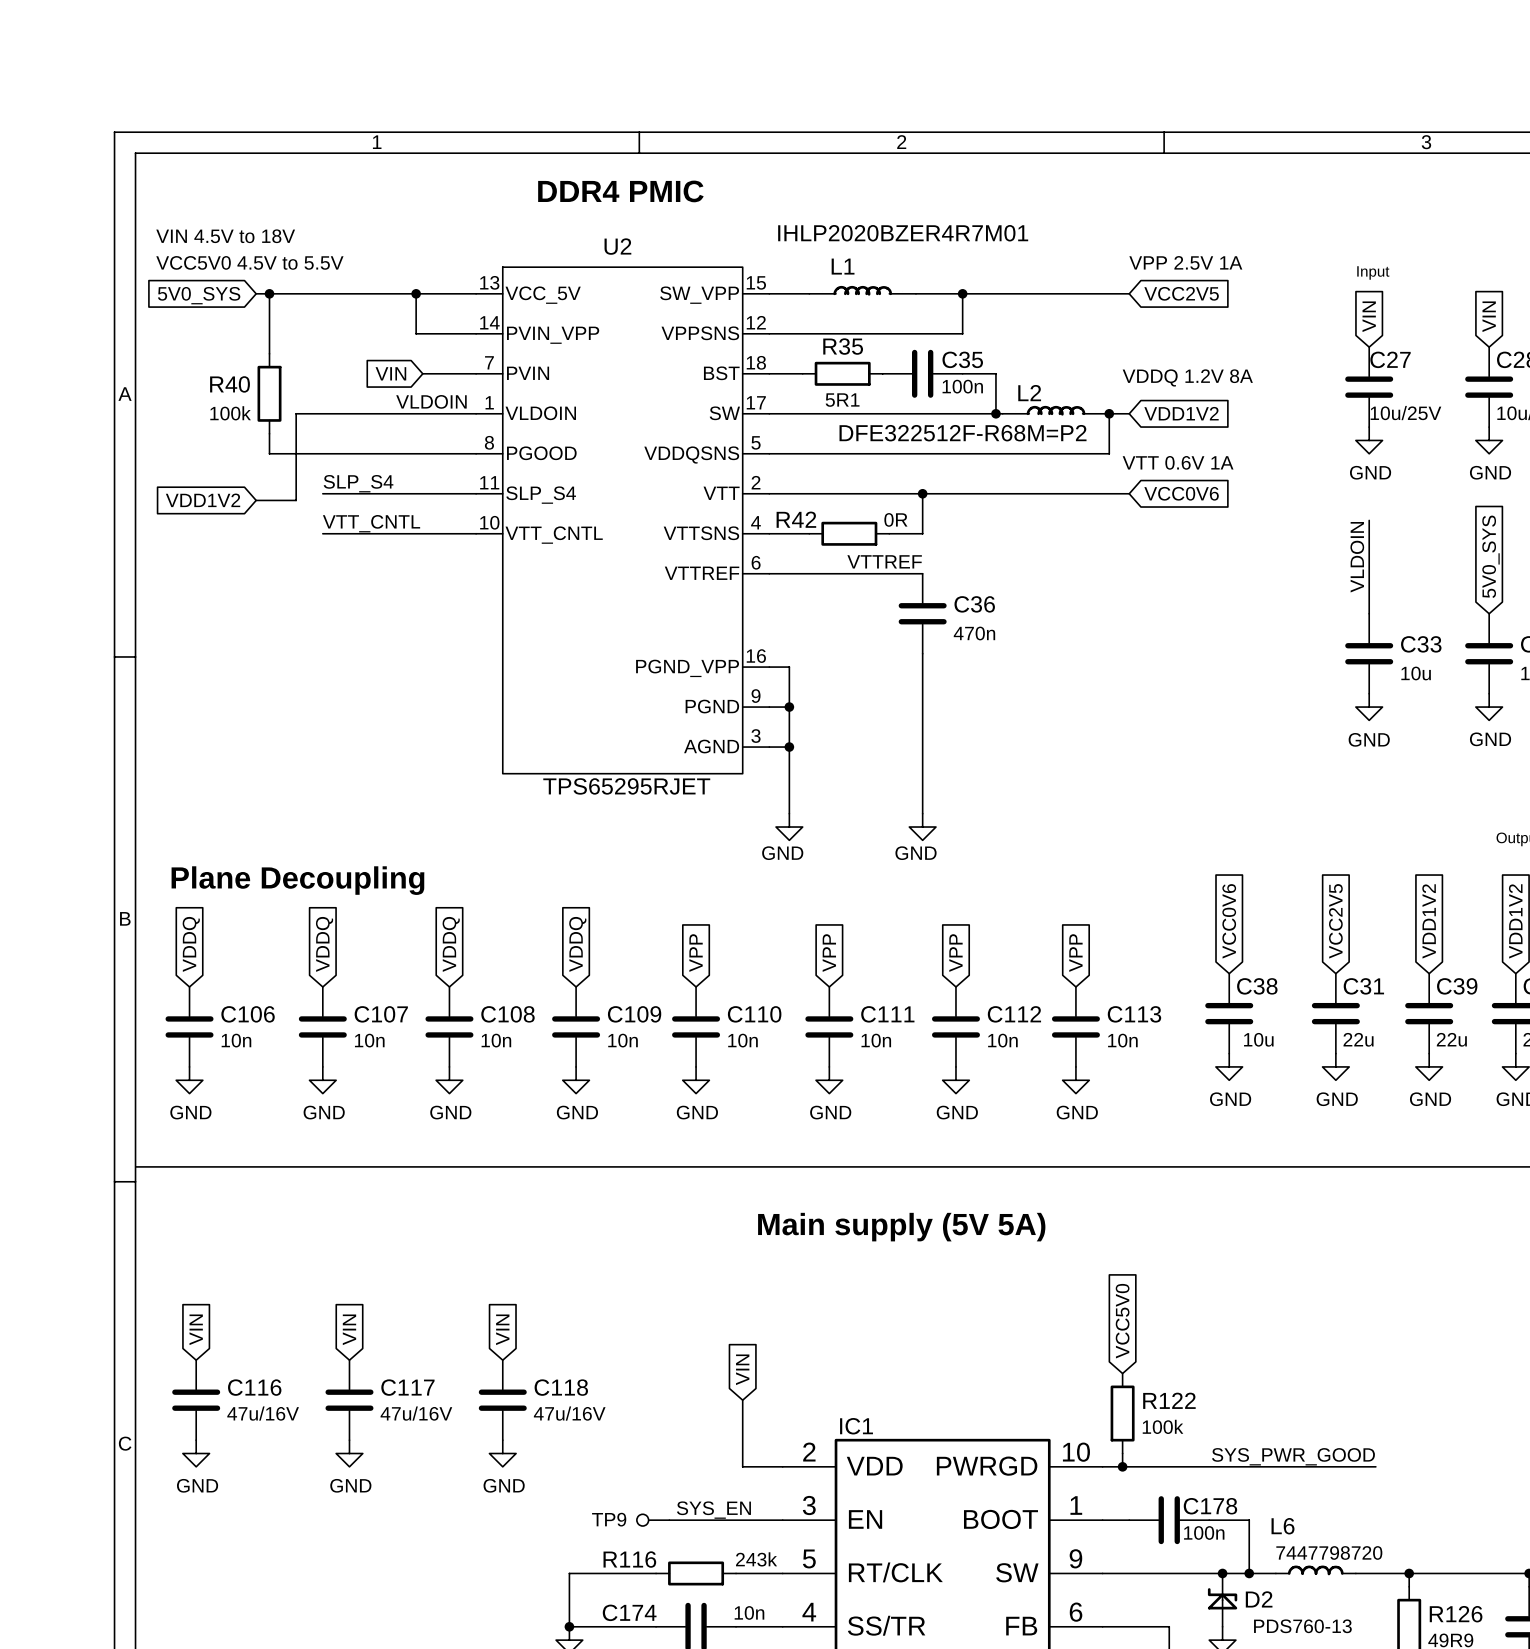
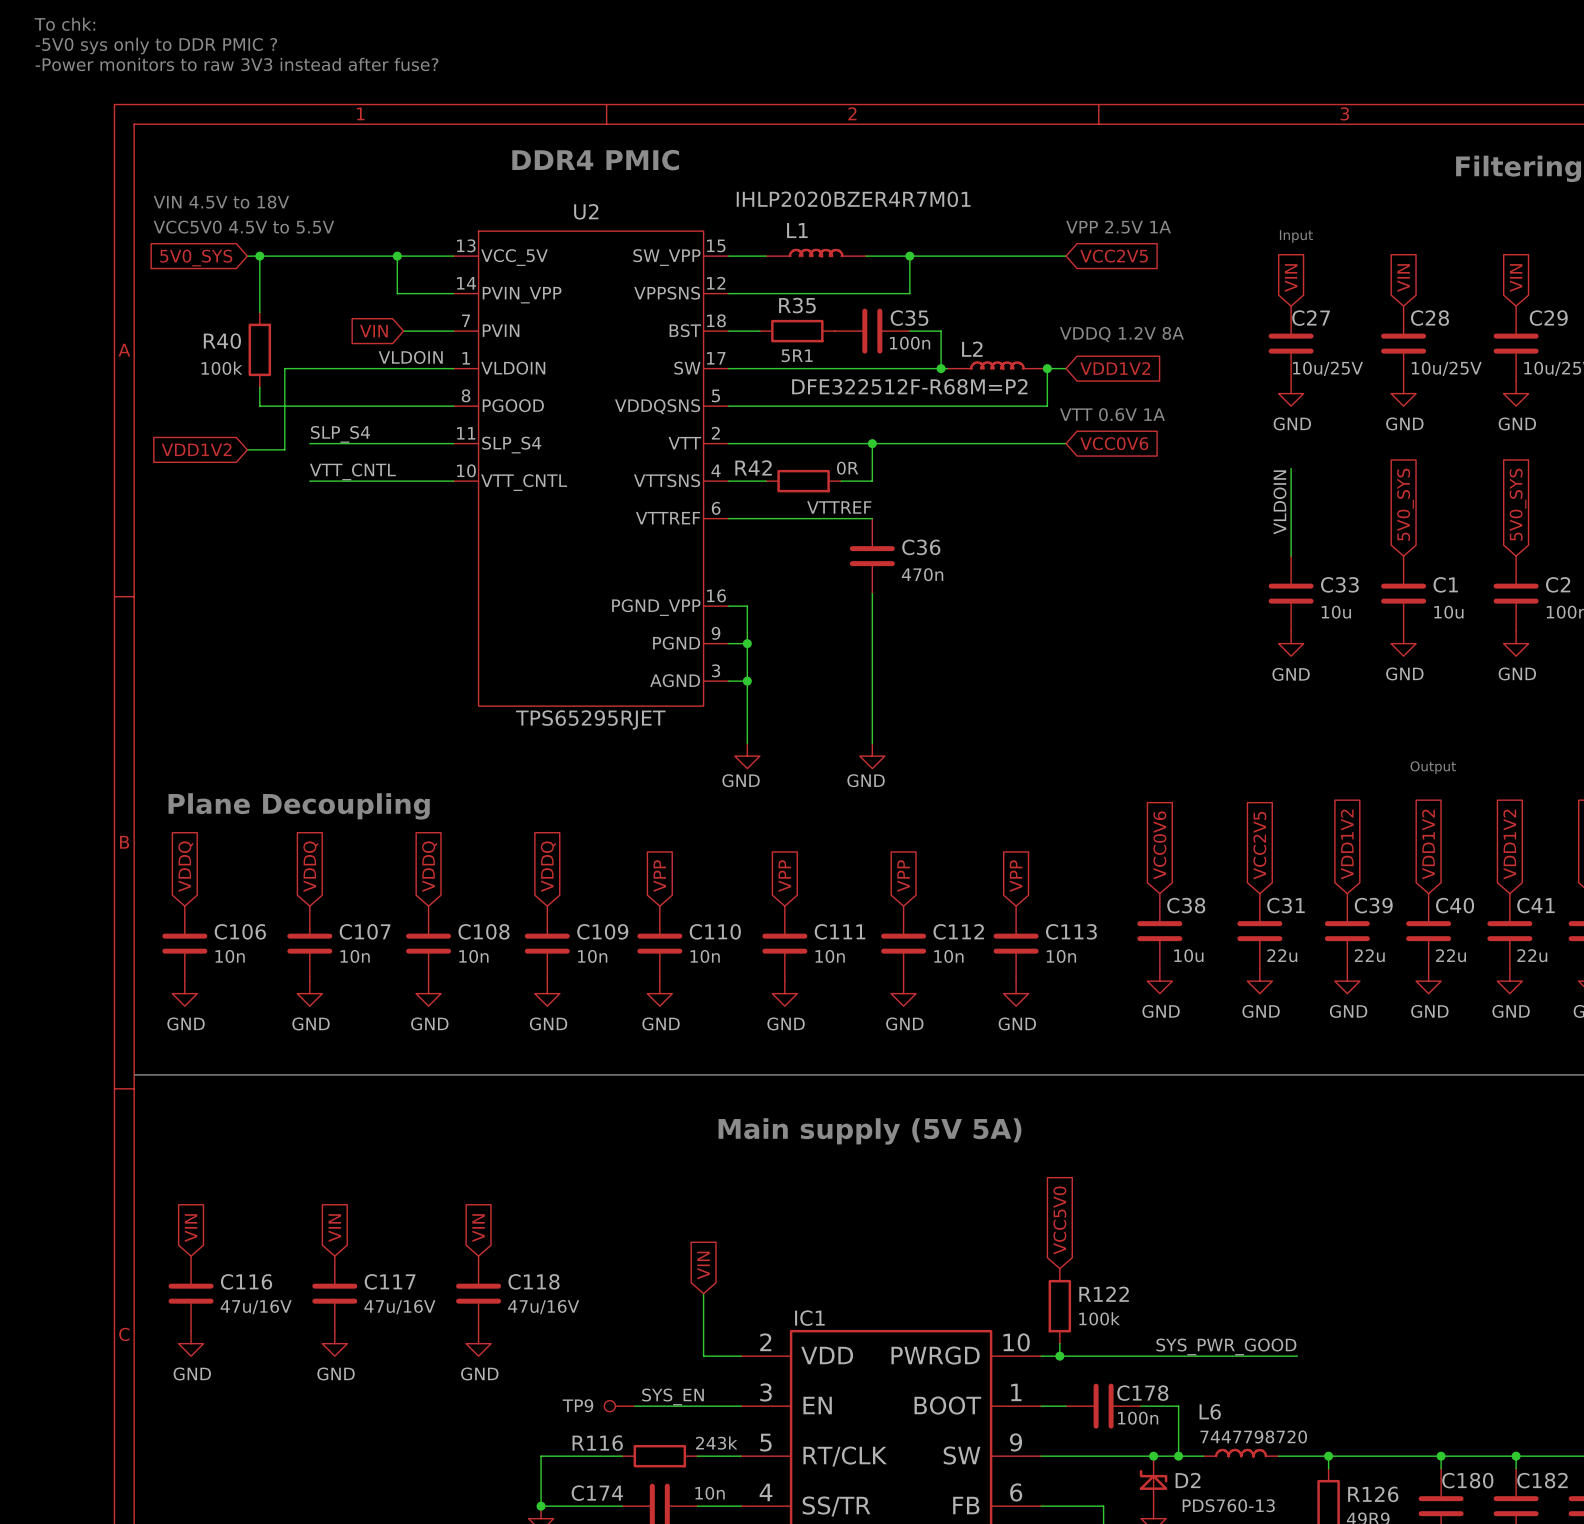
text: none -> To chk: (64, 24)
text: none -> -5V0 sys only to DDR PMIC ? (156, 46)
text: none -> -Power monitors to raw 3V3 instead after fuse? (236, 64)

